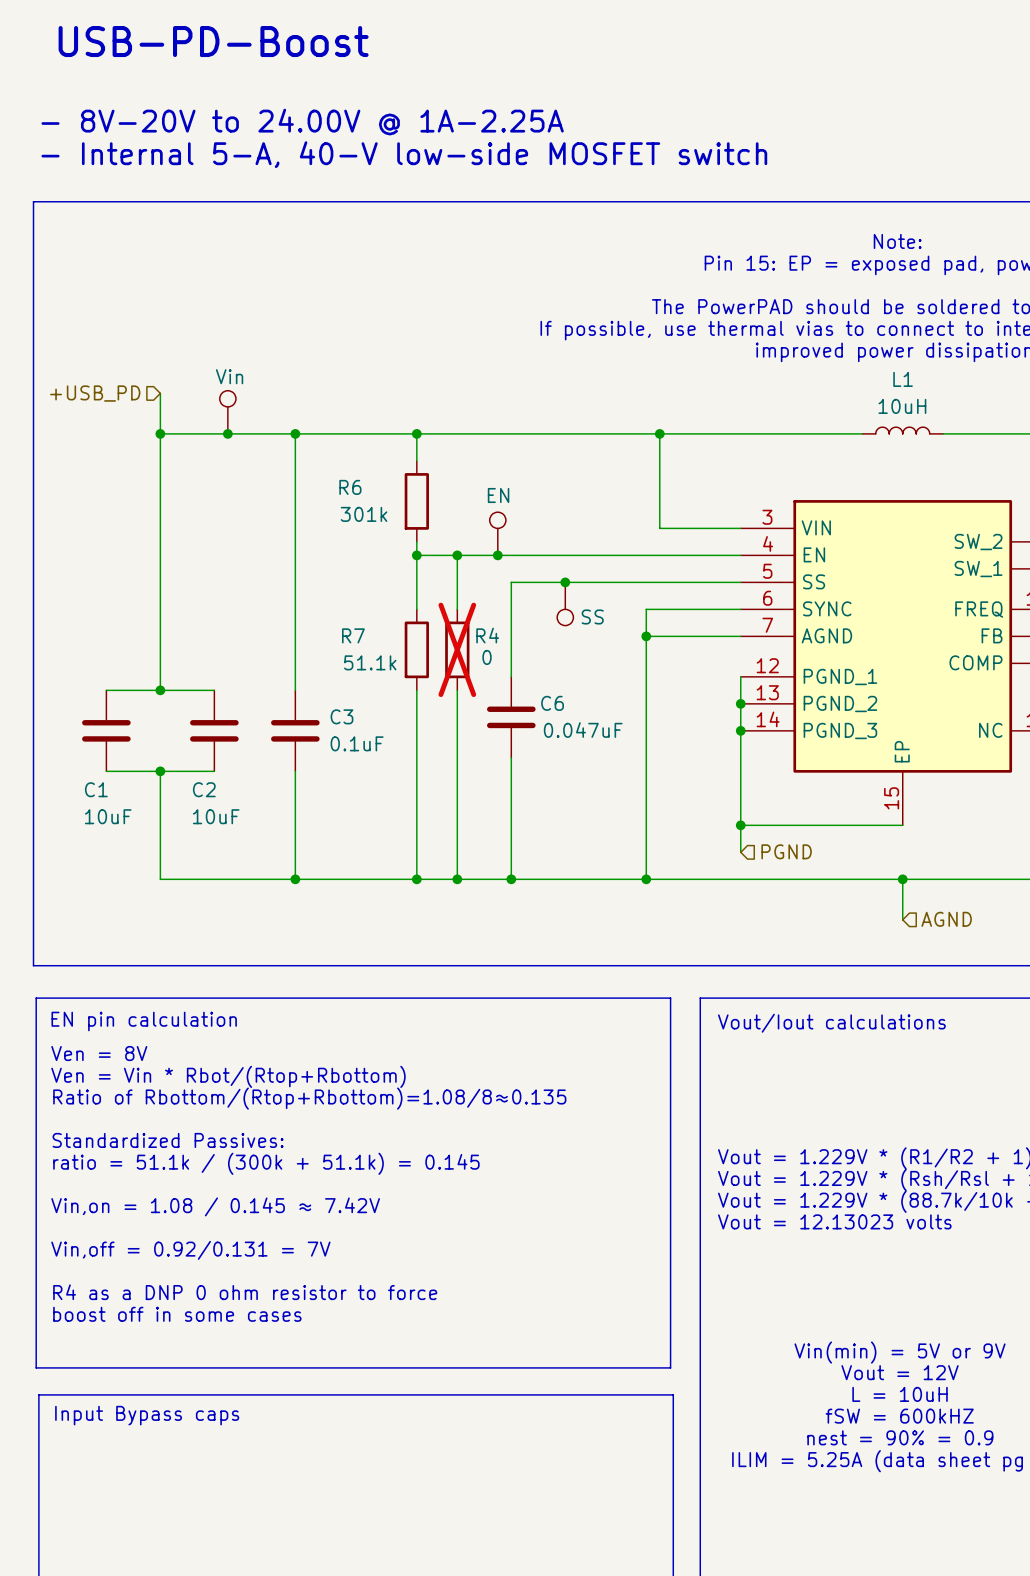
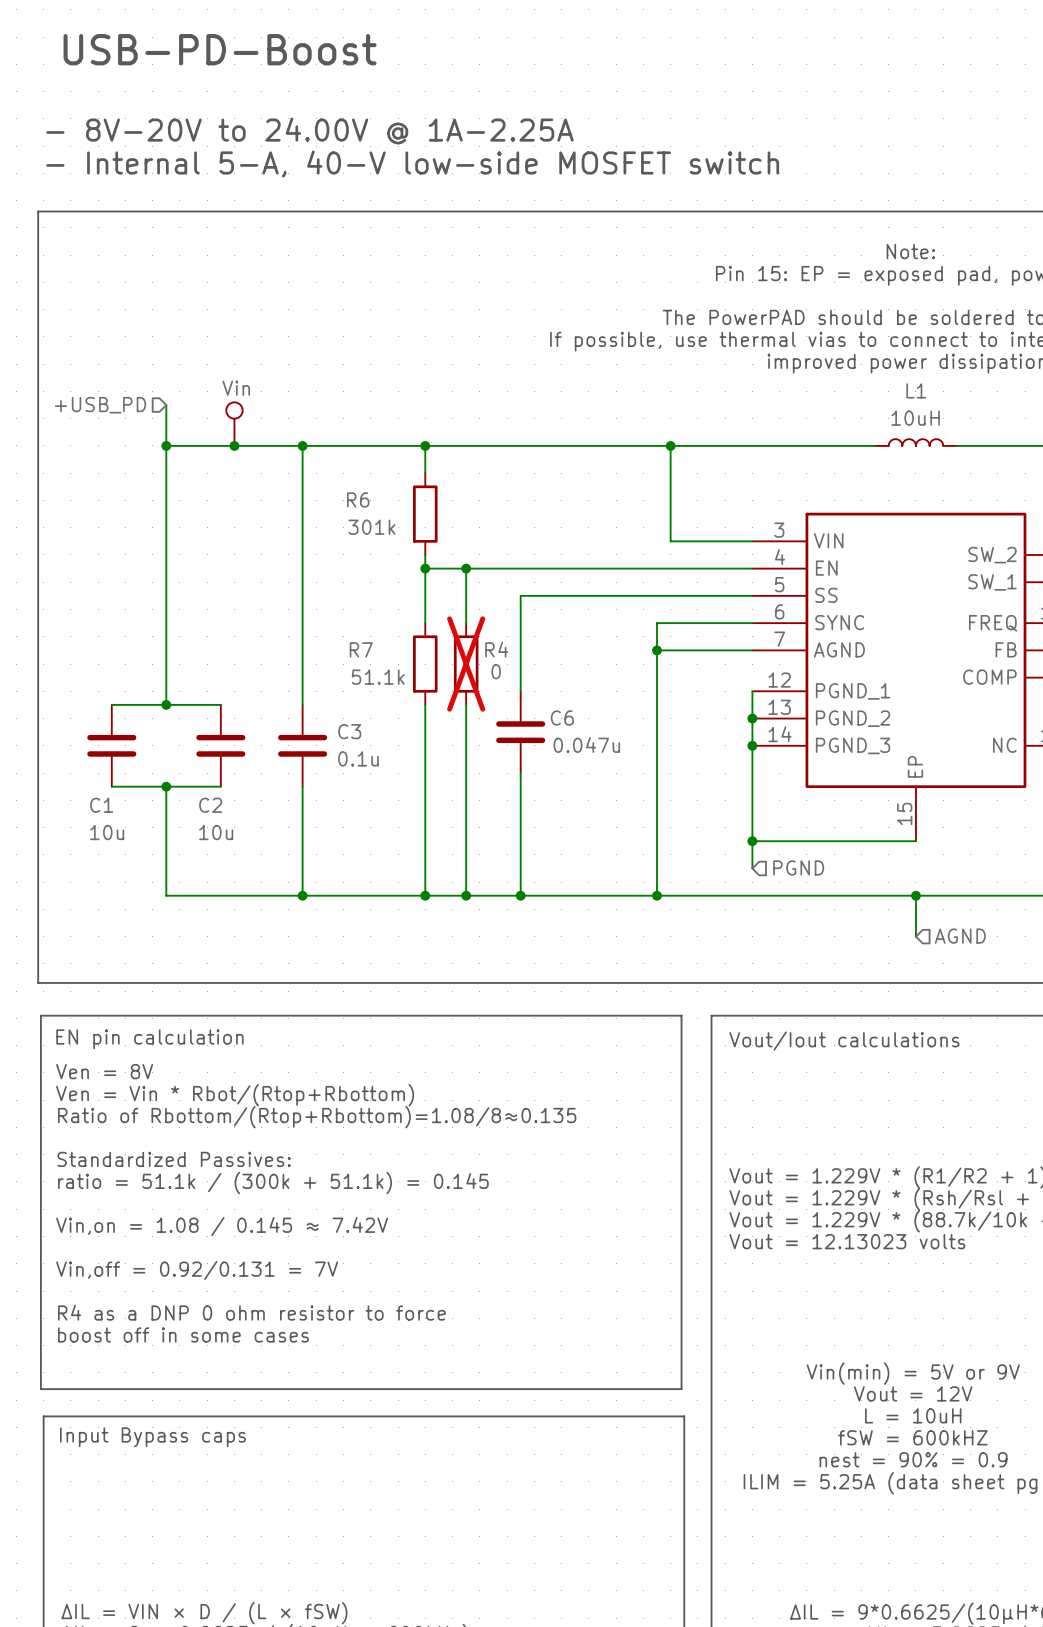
part: EN (497, 533) -> none
junction: (497, 555) -> none
junction: (565, 582) -> none
part: SS (565, 603) -> none
C6 value: 0.047uF (583, 730) -> 0.047u (586, 744)
C3 value: 0.1uF (357, 743) -> 0.1u (358, 758)
C1 value: 10uF (108, 816) -> 10u (107, 832)
C2 value: 10uF (216, 816) -> 10u (216, 832)

